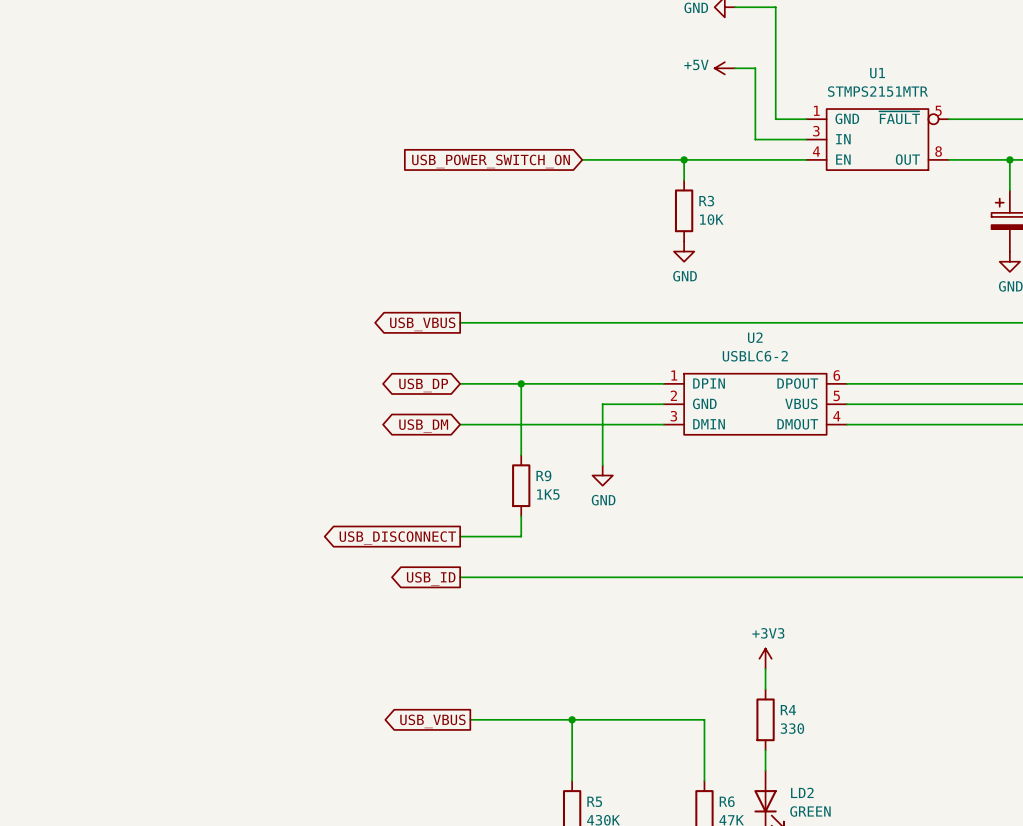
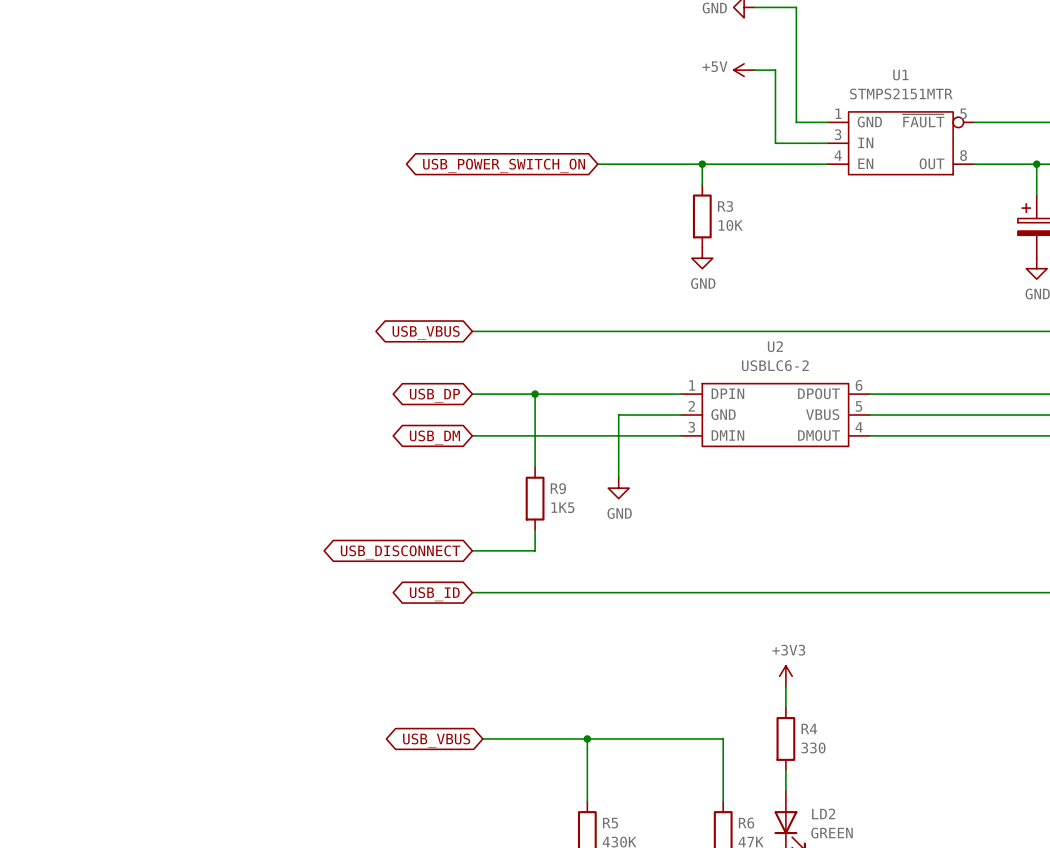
global label shape: input (491, 161) -> bidirectional (504, 165)
global label shape: output (422, 324) -> bidirectional (426, 332)
global label shape: output (397, 538) -> bidirectional (400, 552)
global label shape: output (431, 578) -> bidirectional (434, 594)
global label shape: output (432, 721) -> bidirectional (436, 740)

